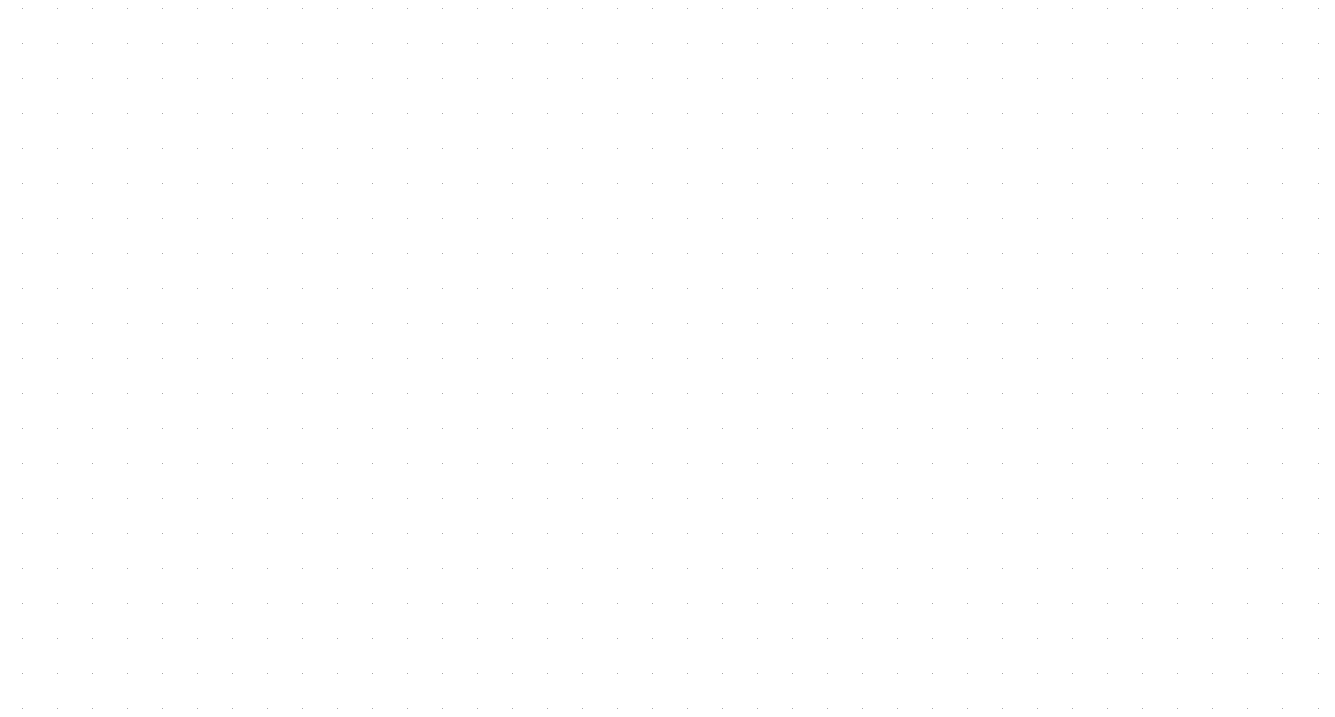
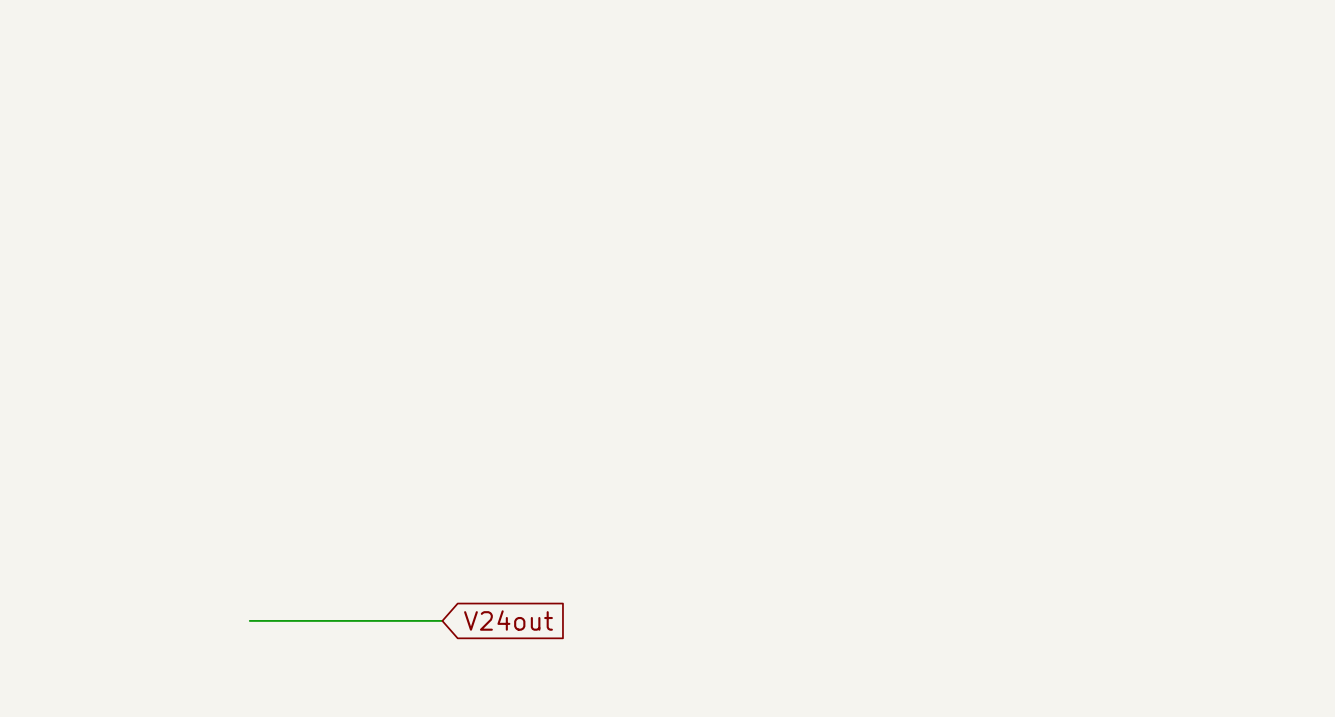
wire: none -> (249, 620) (442, 620)
global label: none -> V24out (508, 620)

